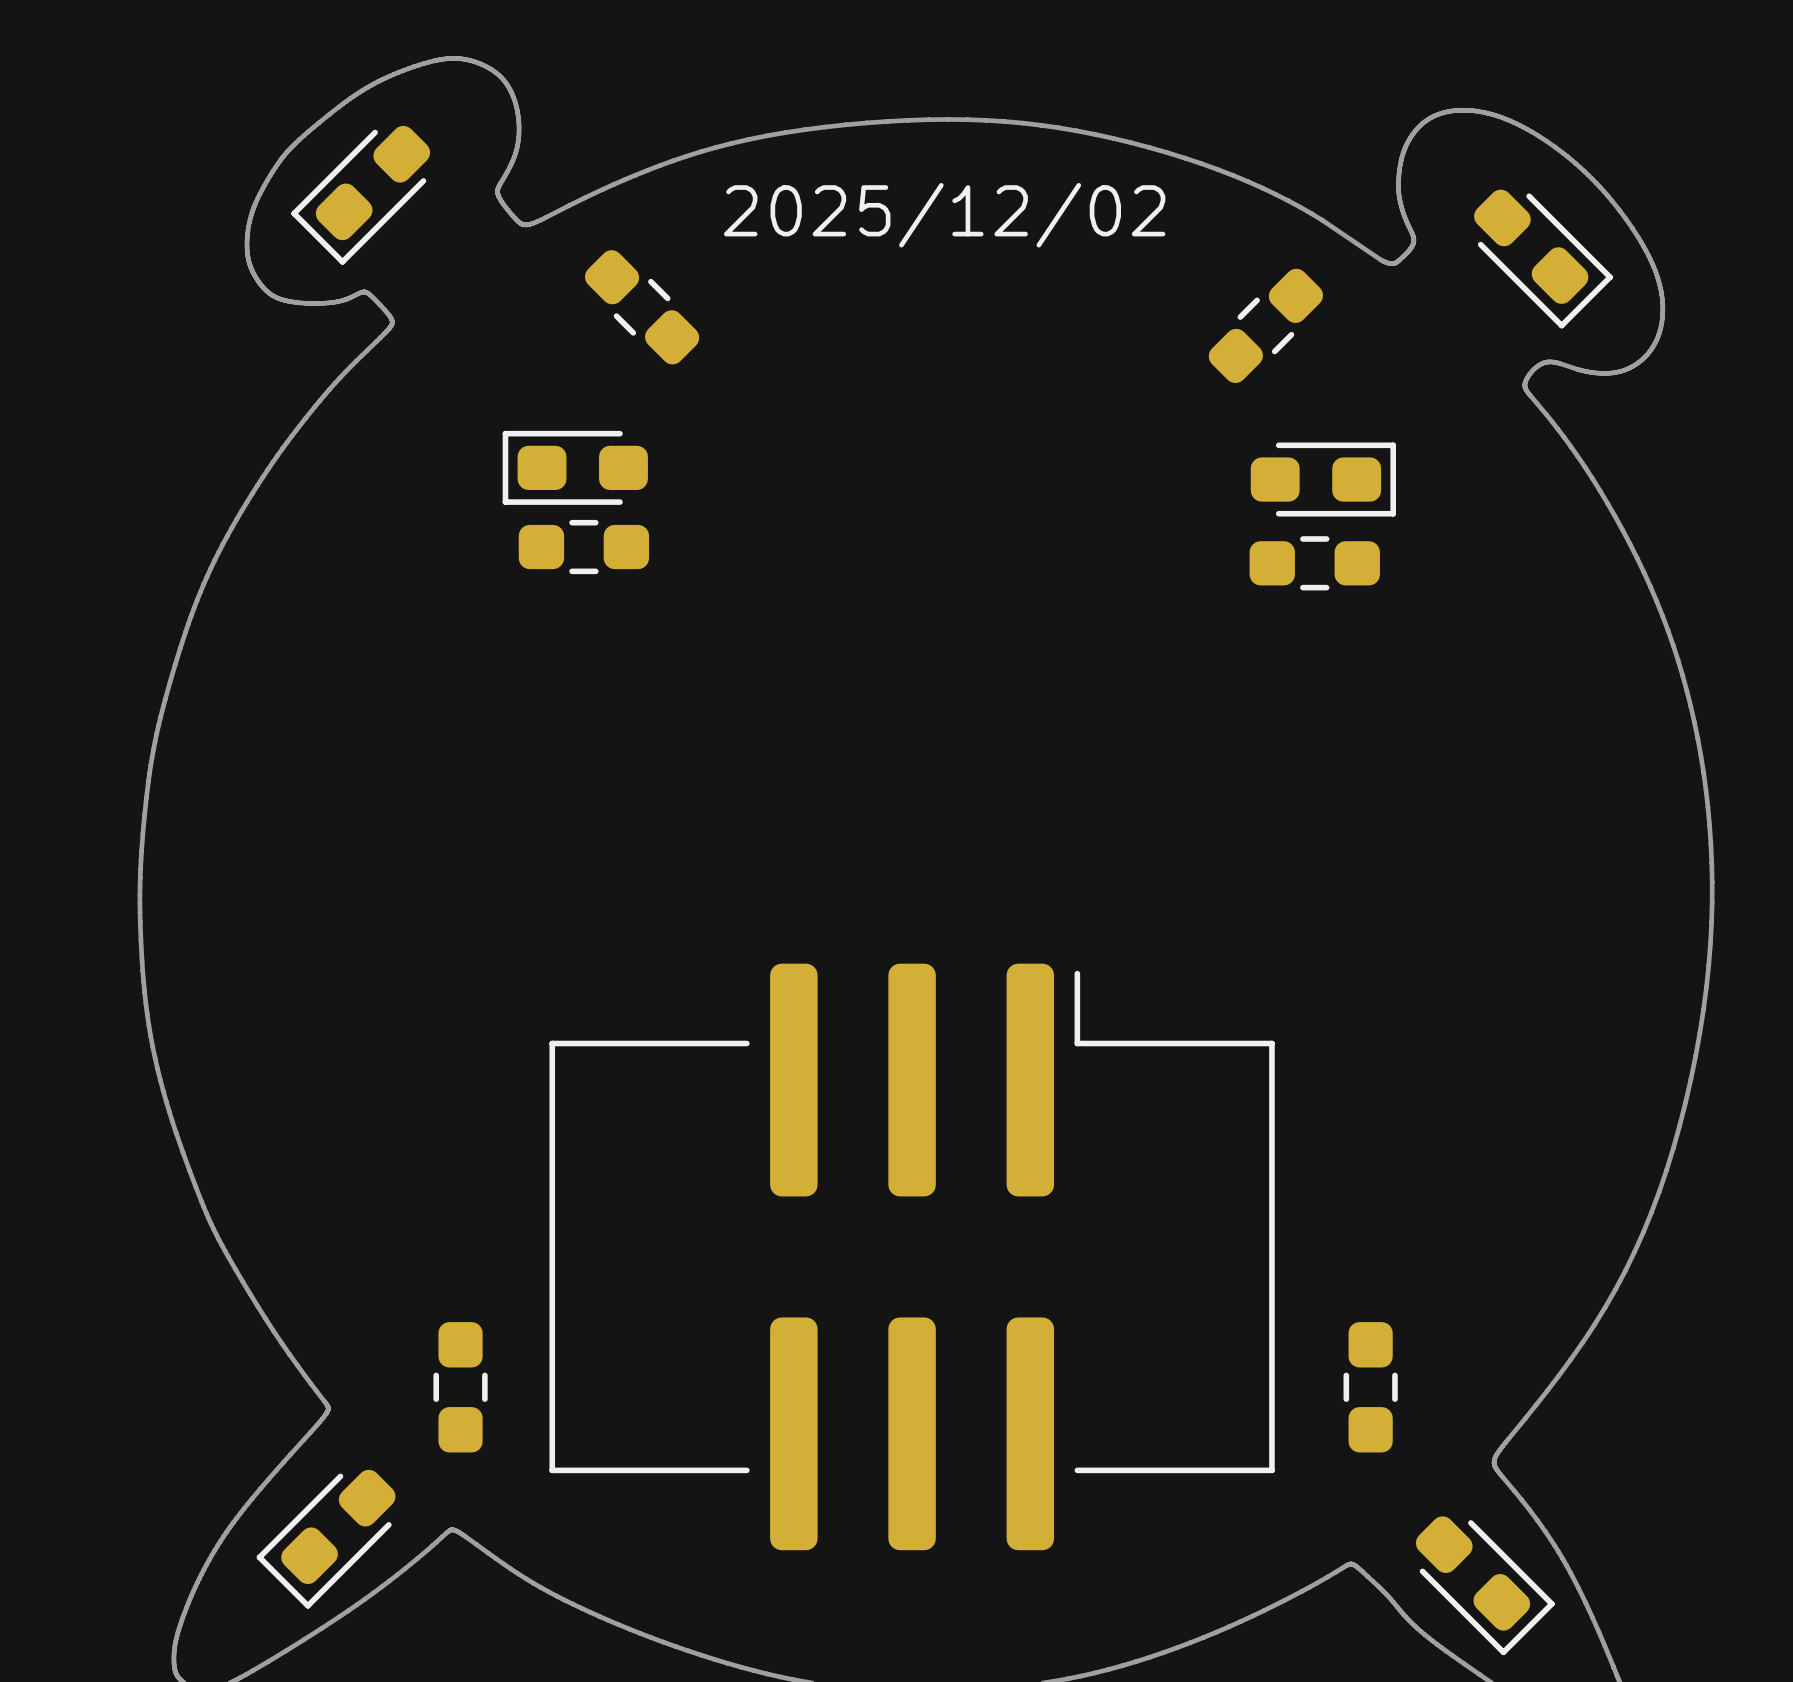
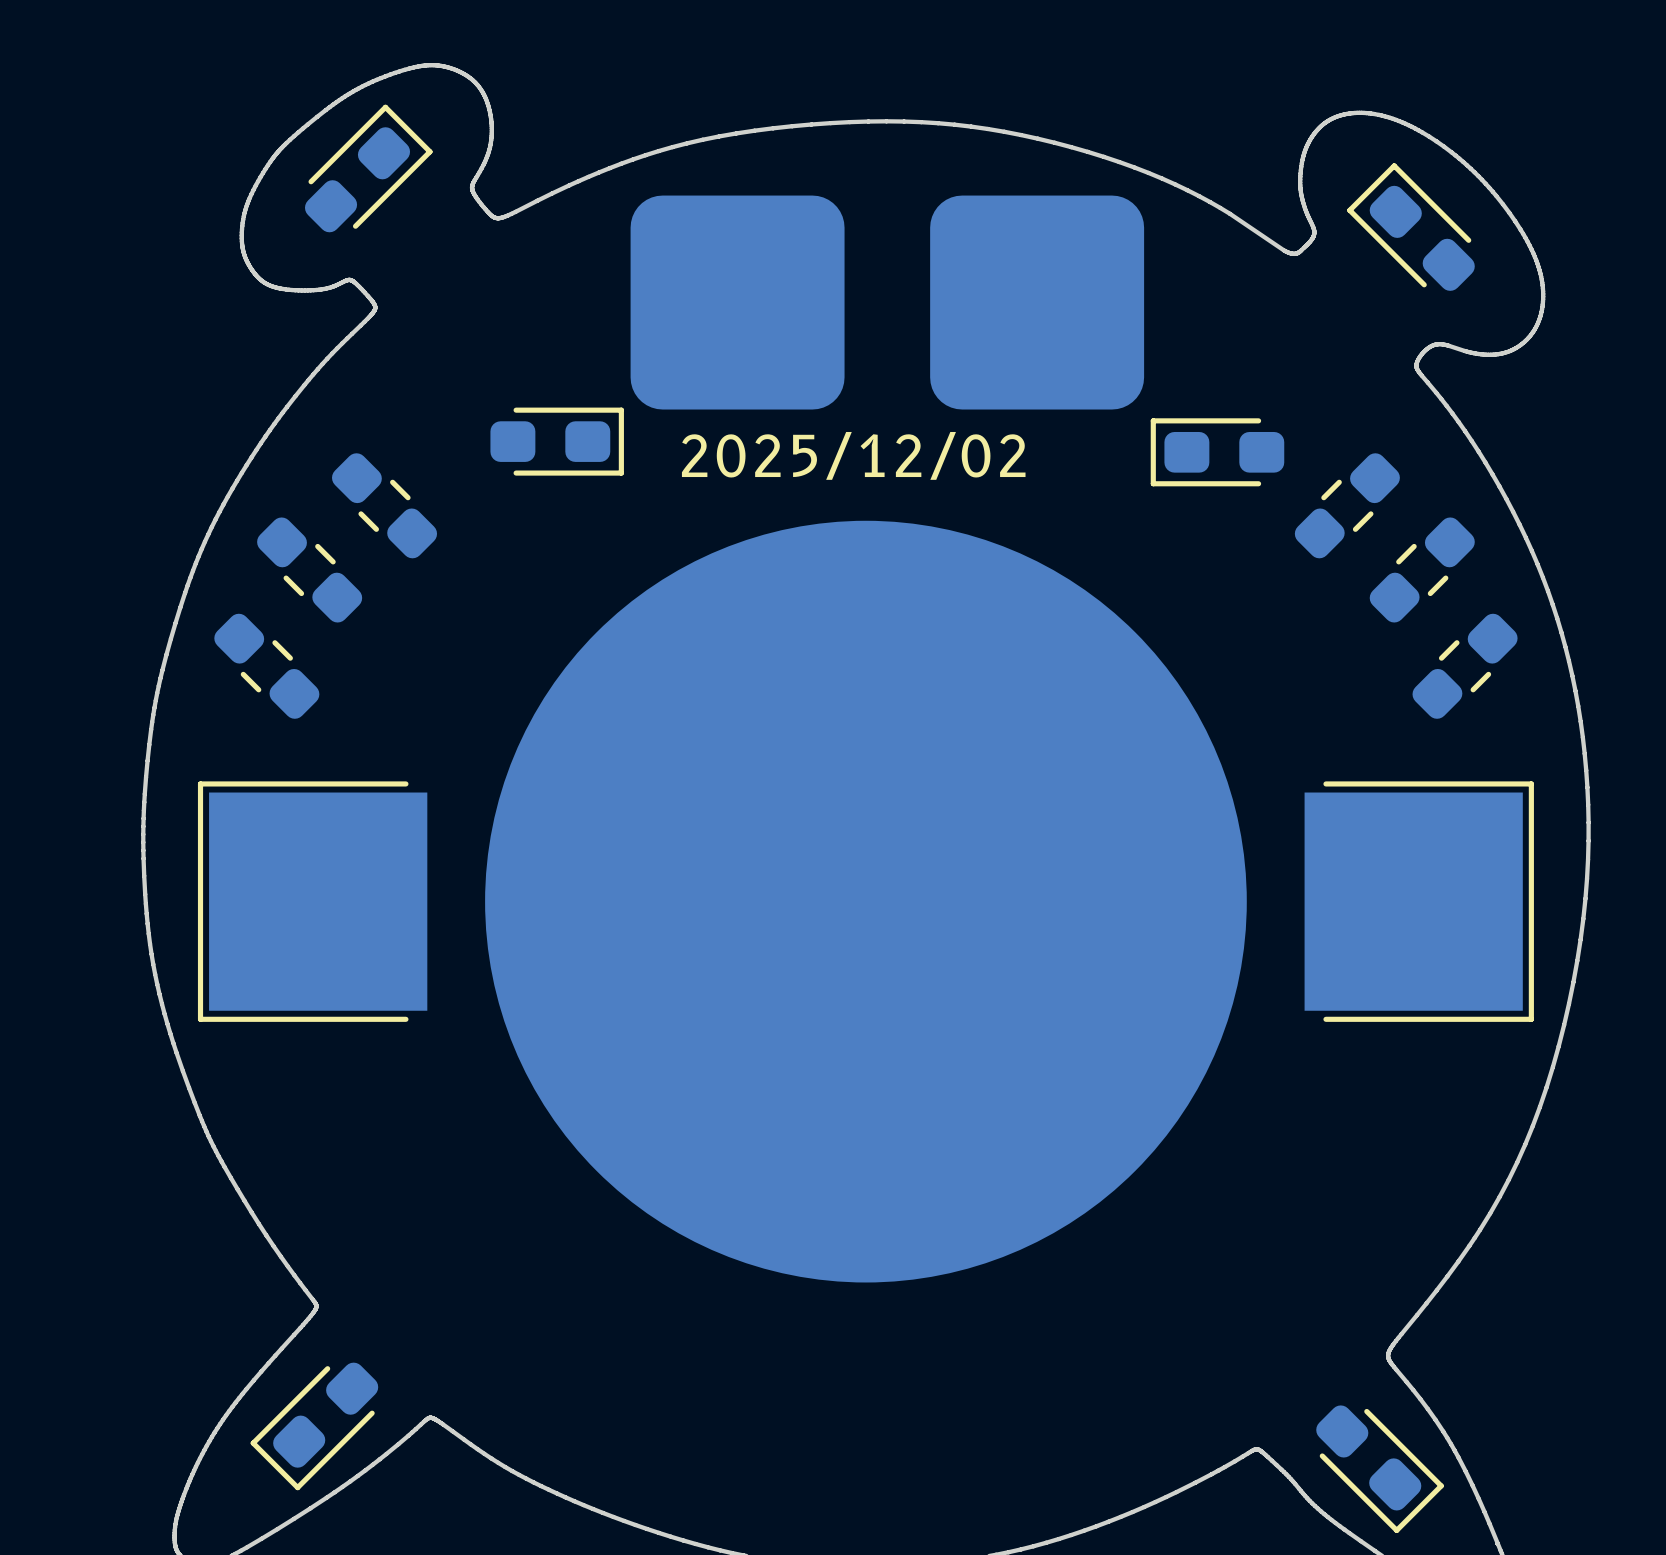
part rotation: 0° (360, 195) -> 180° (368, 168)
text position: 2025/12/02 (944, 215) -> 2025/12/02 (853, 455)
part rotation: 0° (1543, 259) -> 180° (1411, 227)
part: (642, 307) -> none
part: none -> (887, 302)
part: (1265, 325) -> none
part rotation: 0° (575, 467) -> 180° (557, 441)
part rotation: 0° (1323, 479) -> 180° (1217, 452)
part: none -> (384, 505)
part: none -> (1347, 505)
part: (583, 547) -> none
part: (1314, 563) -> none
part: none -> (309, 569)
part: none -> (1422, 569)
part: none -> (266, 666)
part: none -> (1465, 666)
part: none -> (865, 901)
part: (912, 1256) -> none
part: (460, 1387) -> none
part: (1370, 1387) -> none

